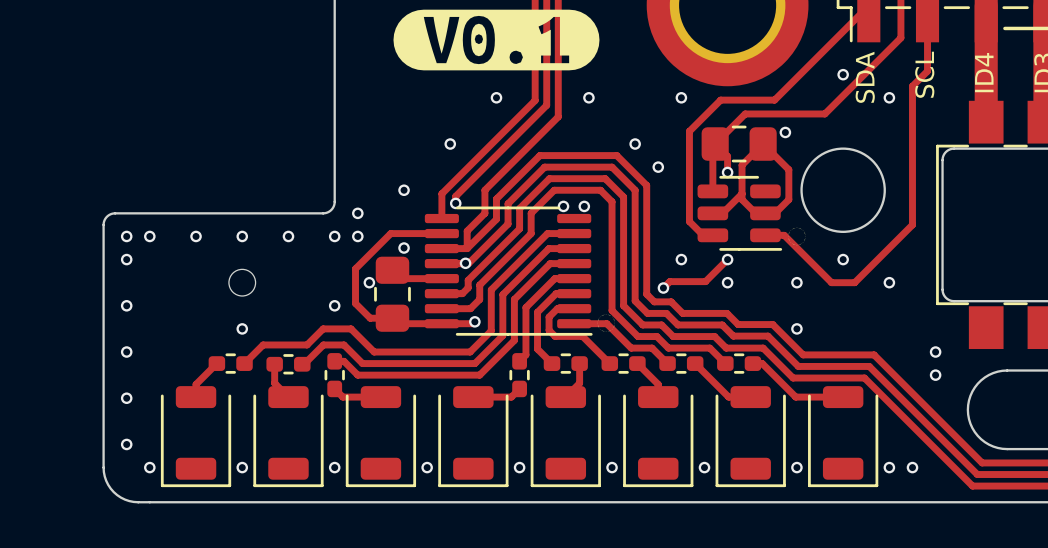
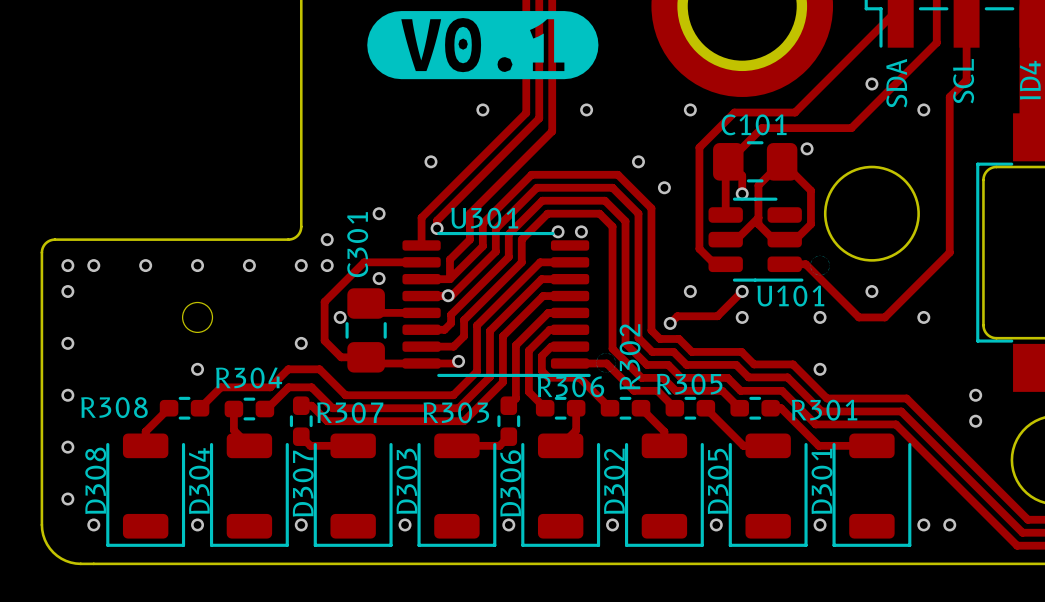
C101 name: none -> C101 (754, 124)
U301 name: none -> U301 (484, 218)
C301 name: none -> C301 (357, 244)
U101 name: none -> U101 (790, 296)
R302 name: none -> R302 (630, 356)
R304 name: none -> R304 (249, 378)
R305 name: none -> R305 (689, 384)
R306 name: none -> R306 (570, 386)
R308 name: none -> R308 (114, 407)
R301 name: none -> R301 (824, 410)
R307 name: none -> R307 (350, 412)
R303 name: none -> R303 (456, 412)
D308 name: none -> D308 (95, 480)
D304 name: none -> D304 (199, 481)
D303 name: none -> D303 (406, 481)
D302 name: none -> D302 (614, 481)
D305 name: none -> D305 (718, 481)
D301 name: none -> D301 (821, 481)
D307 name: none -> D307 (303, 483)
D306 name: none -> D306 (510, 483)

